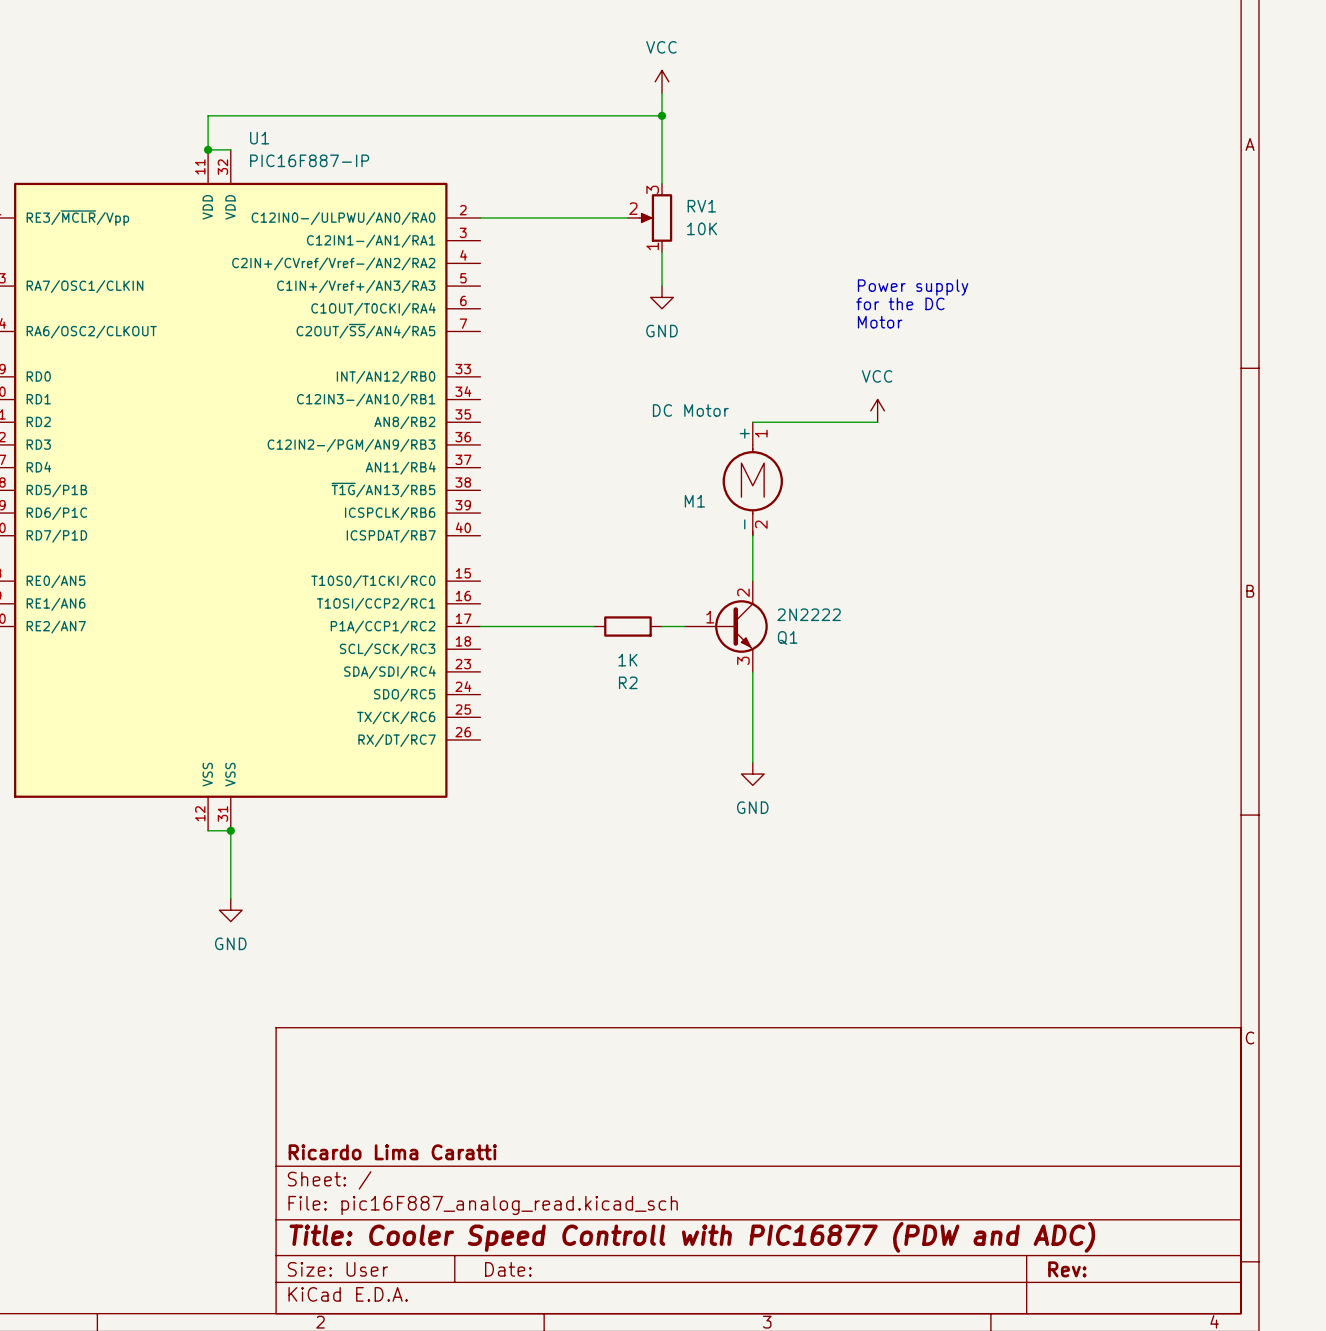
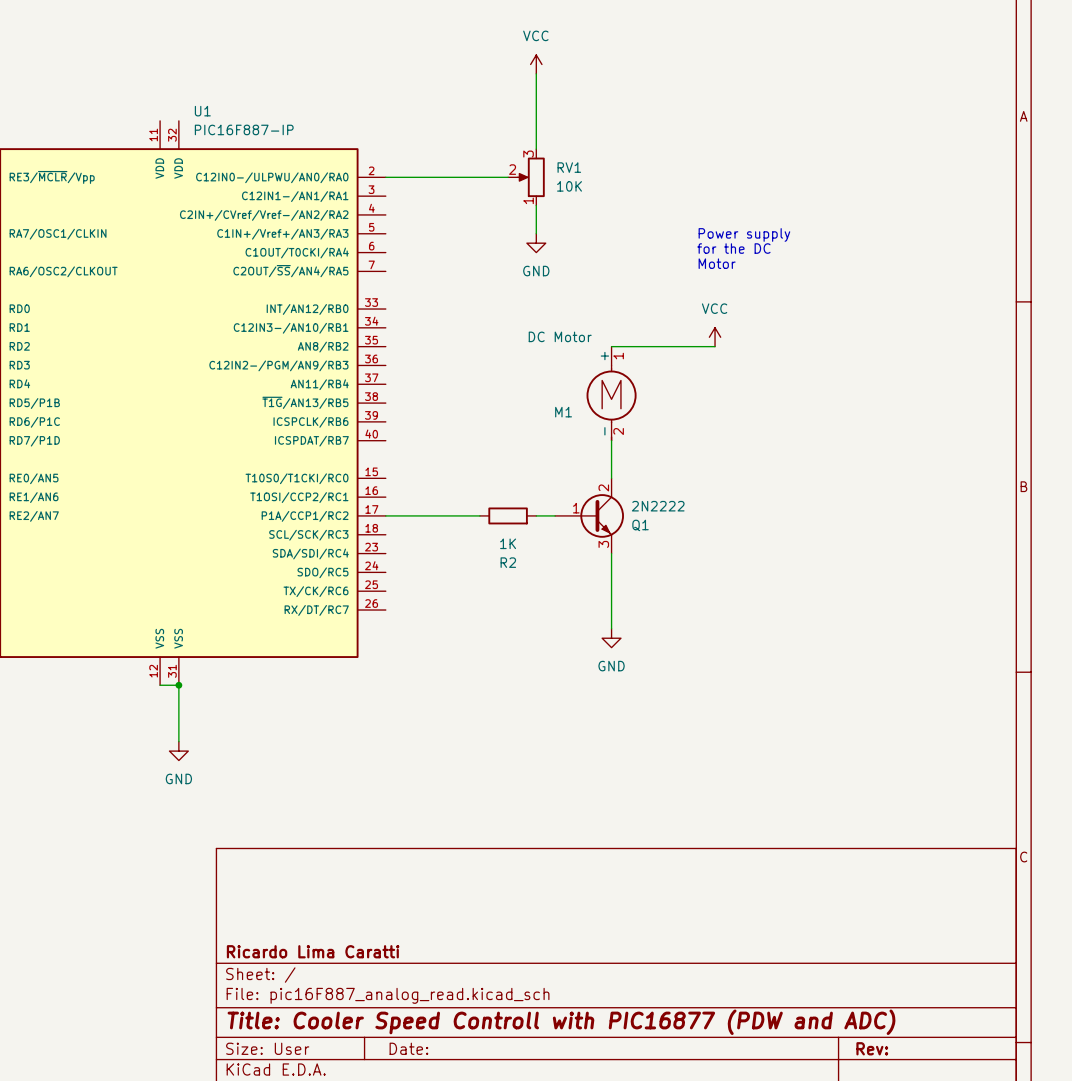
wire: (662, 115) (208, 115) (208, 149) (230, 149) -> none
junction: (662, 115) -> none
junction: (208, 149) -> none

